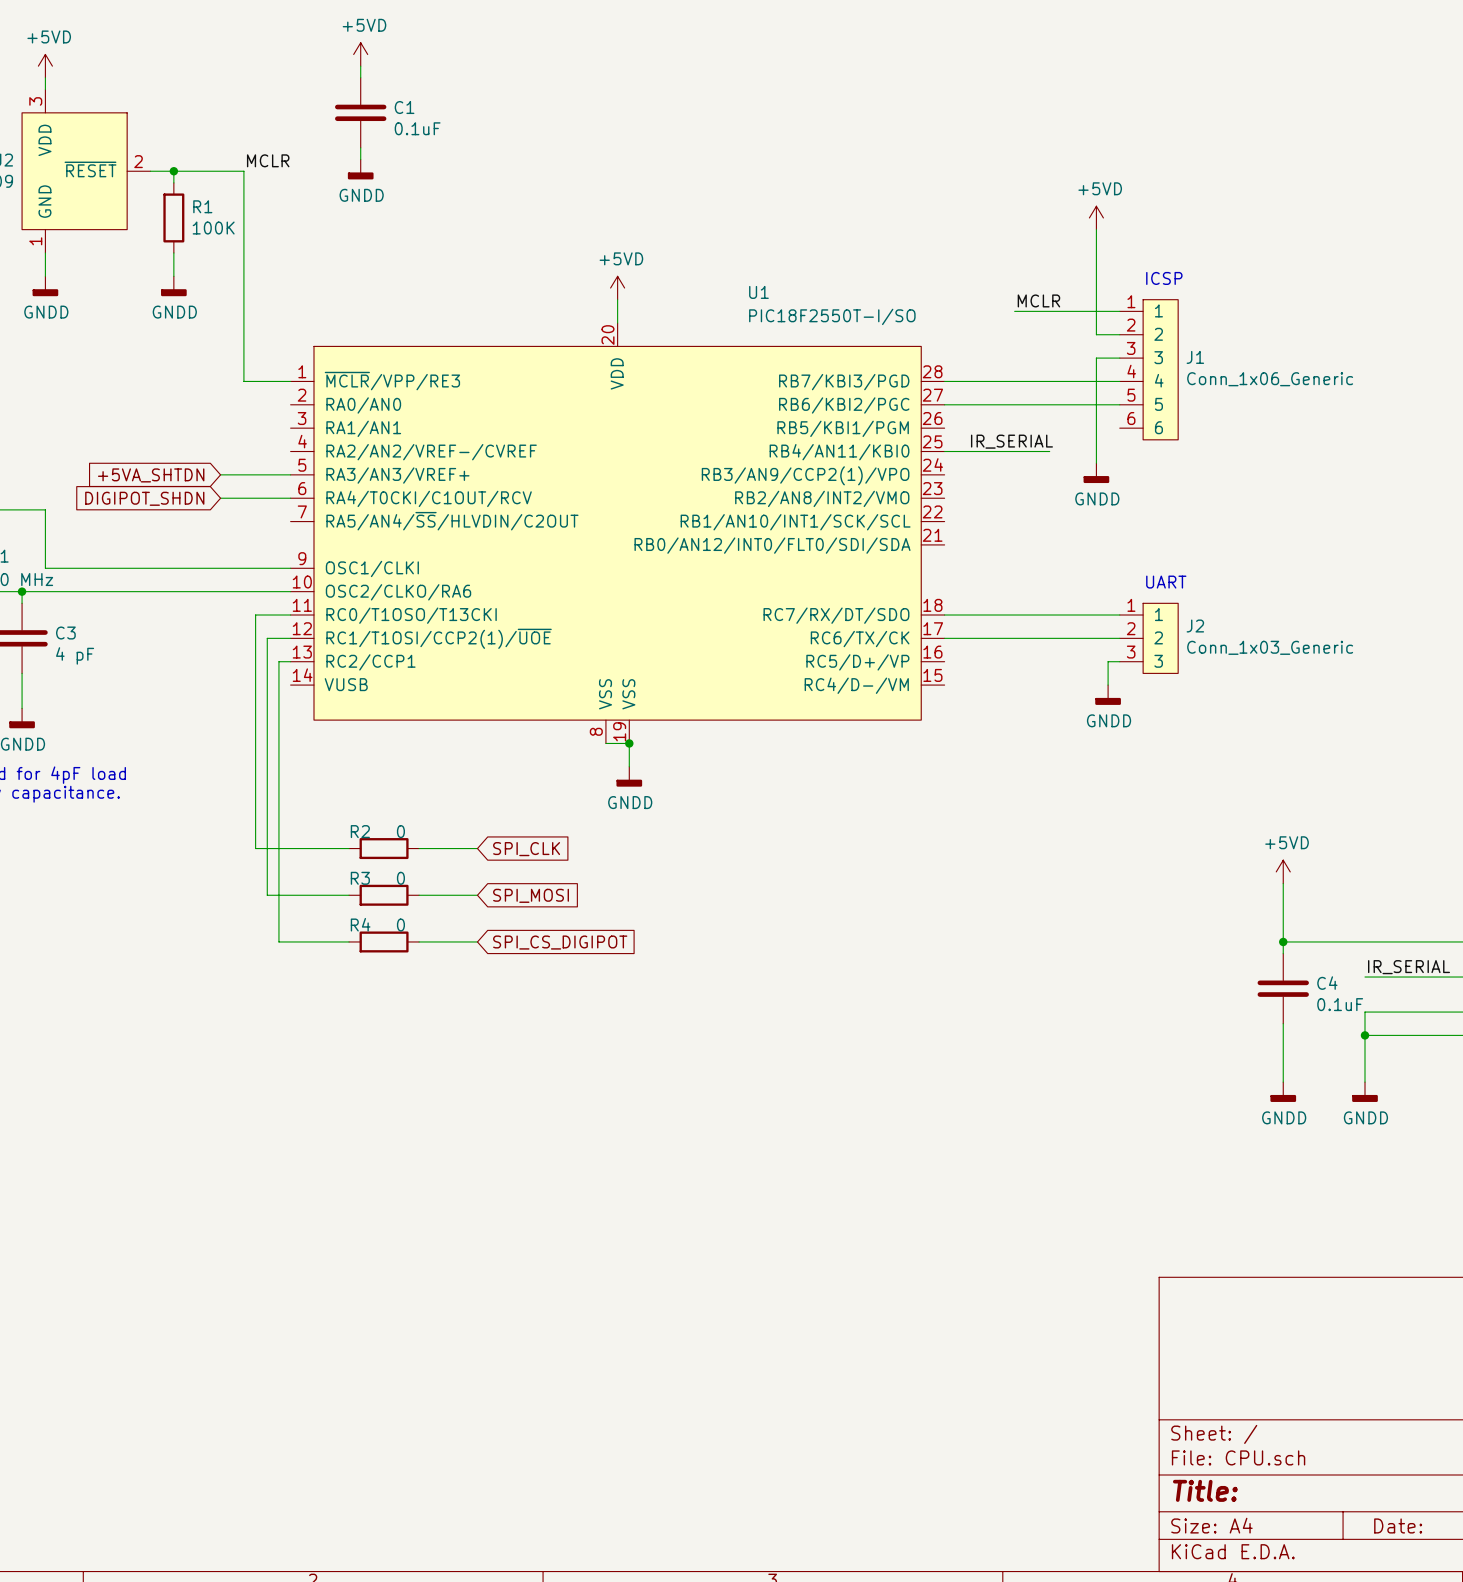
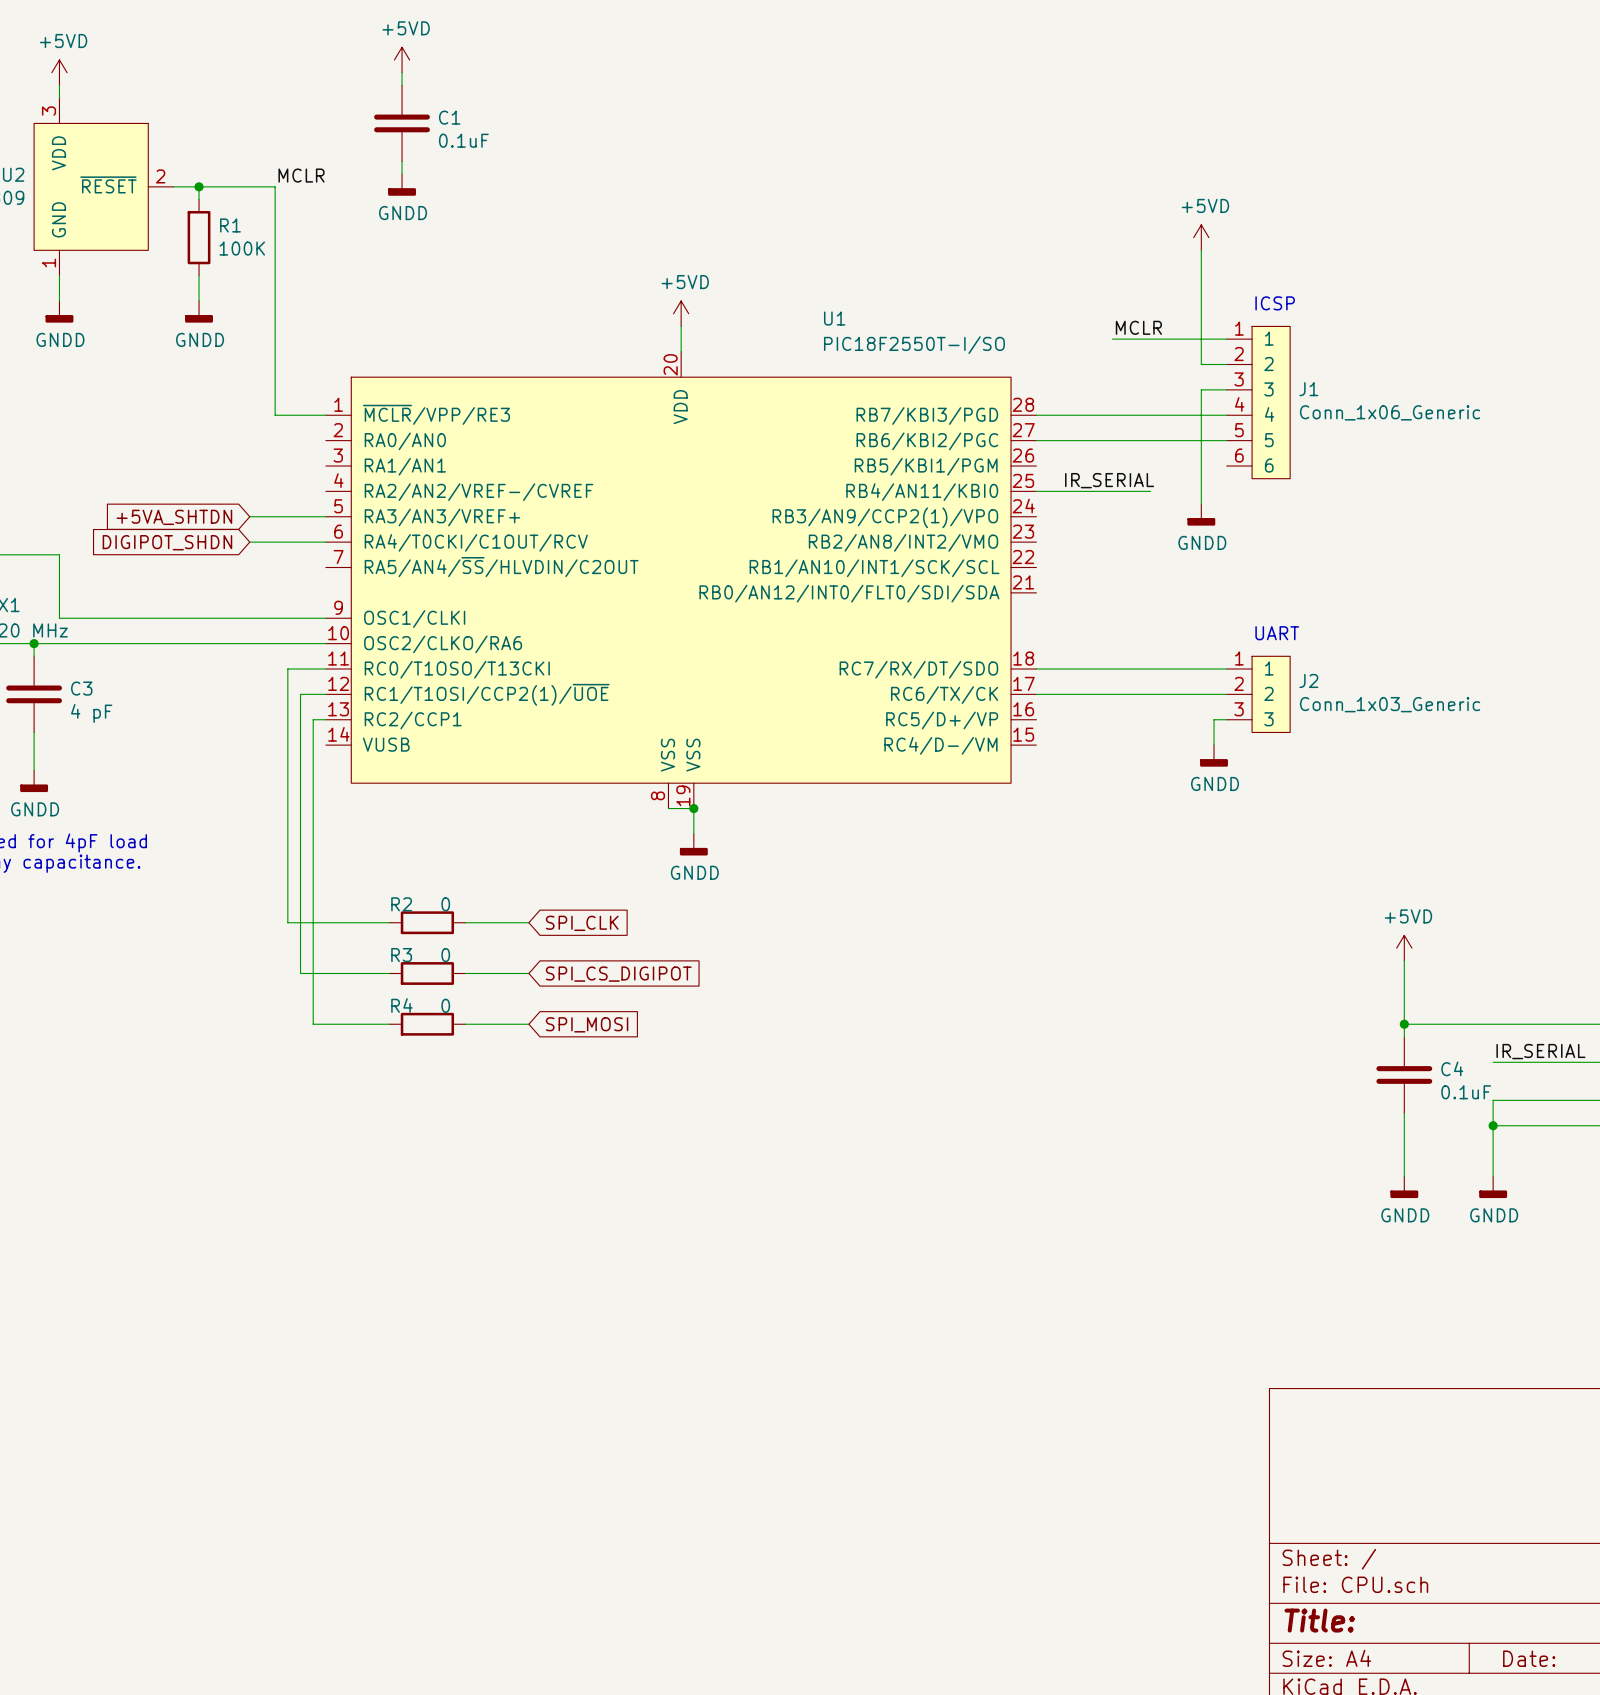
global label: SPI_MOSI (531, 895) -> SPI_CS_DIGIPOT (618, 974)
global label: SPI_CS_DIGIPOT (560, 942) -> SPI_MOSI (587, 1024)

